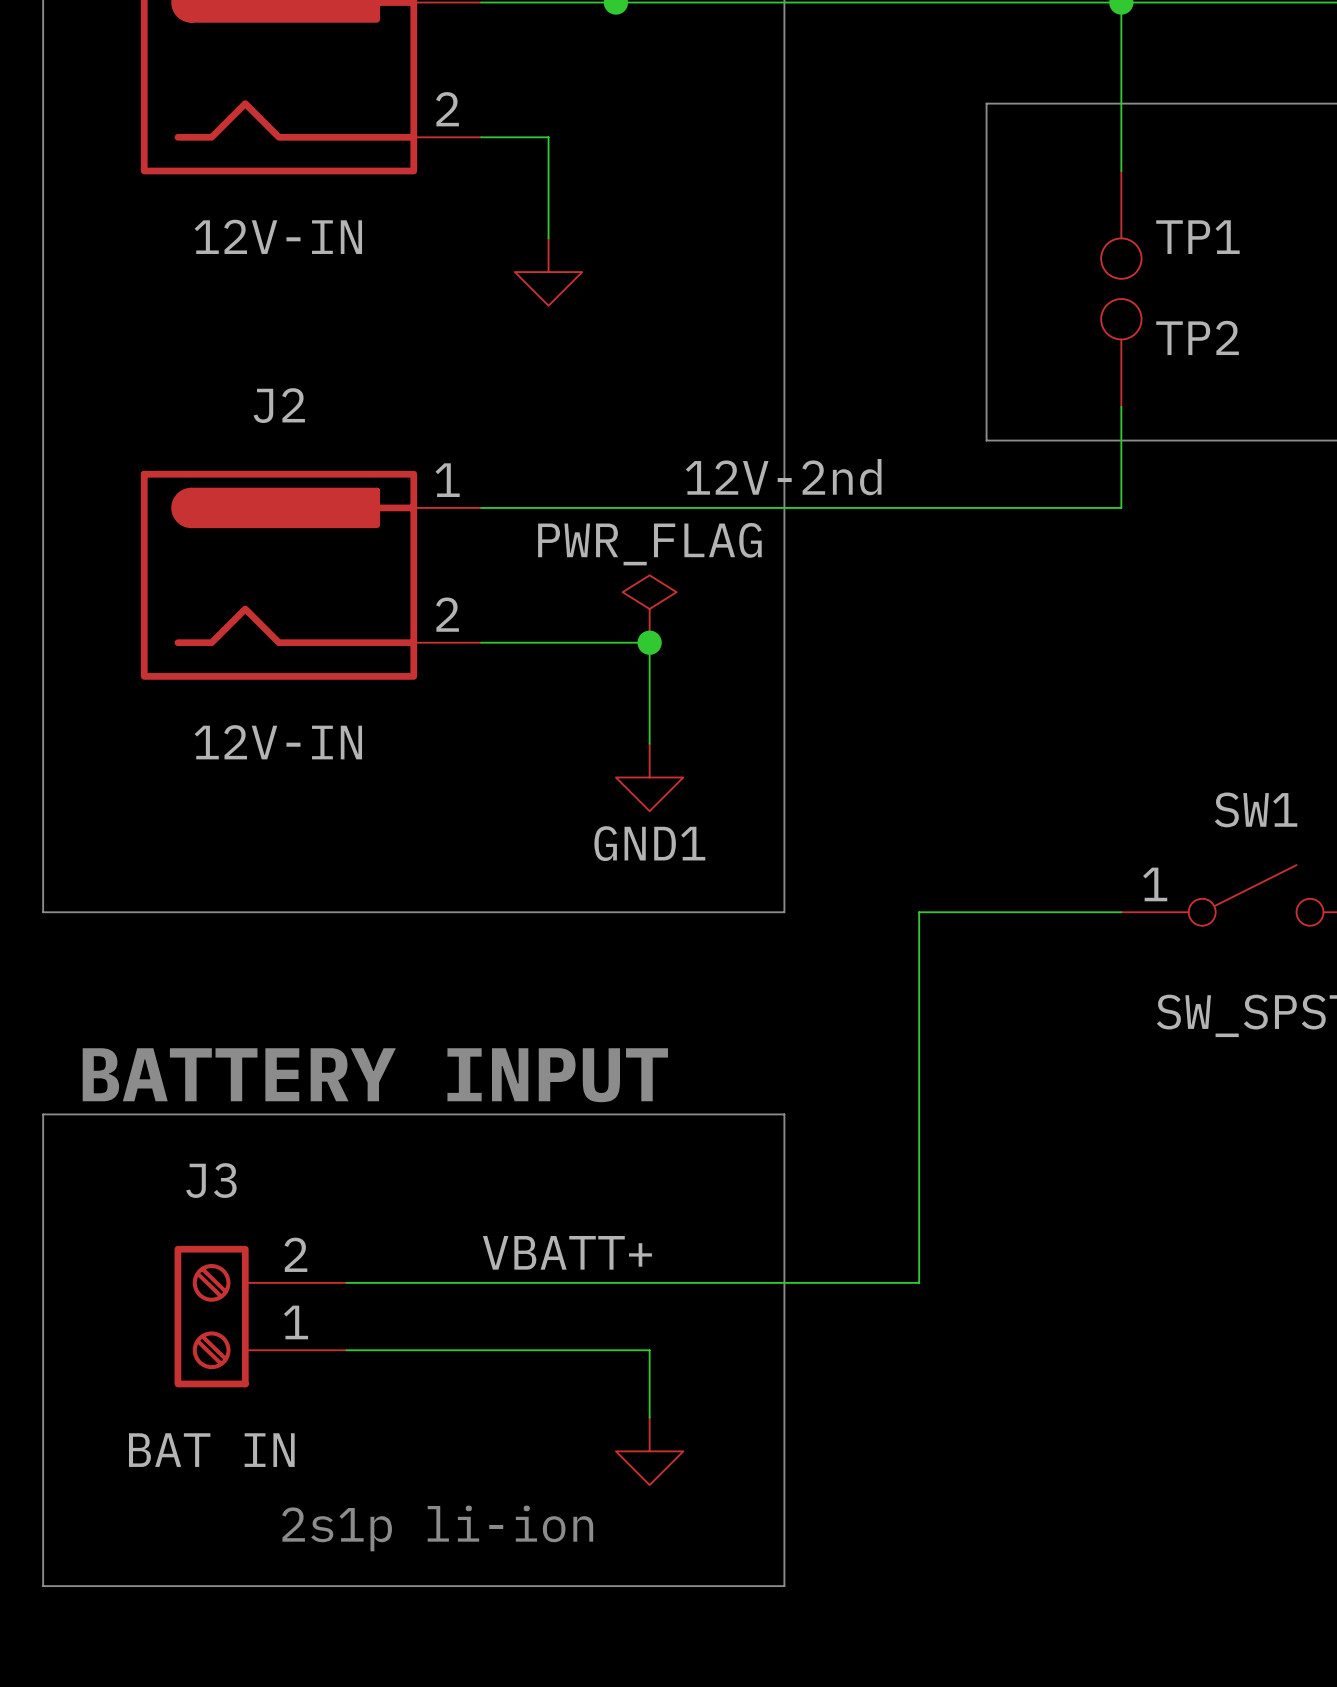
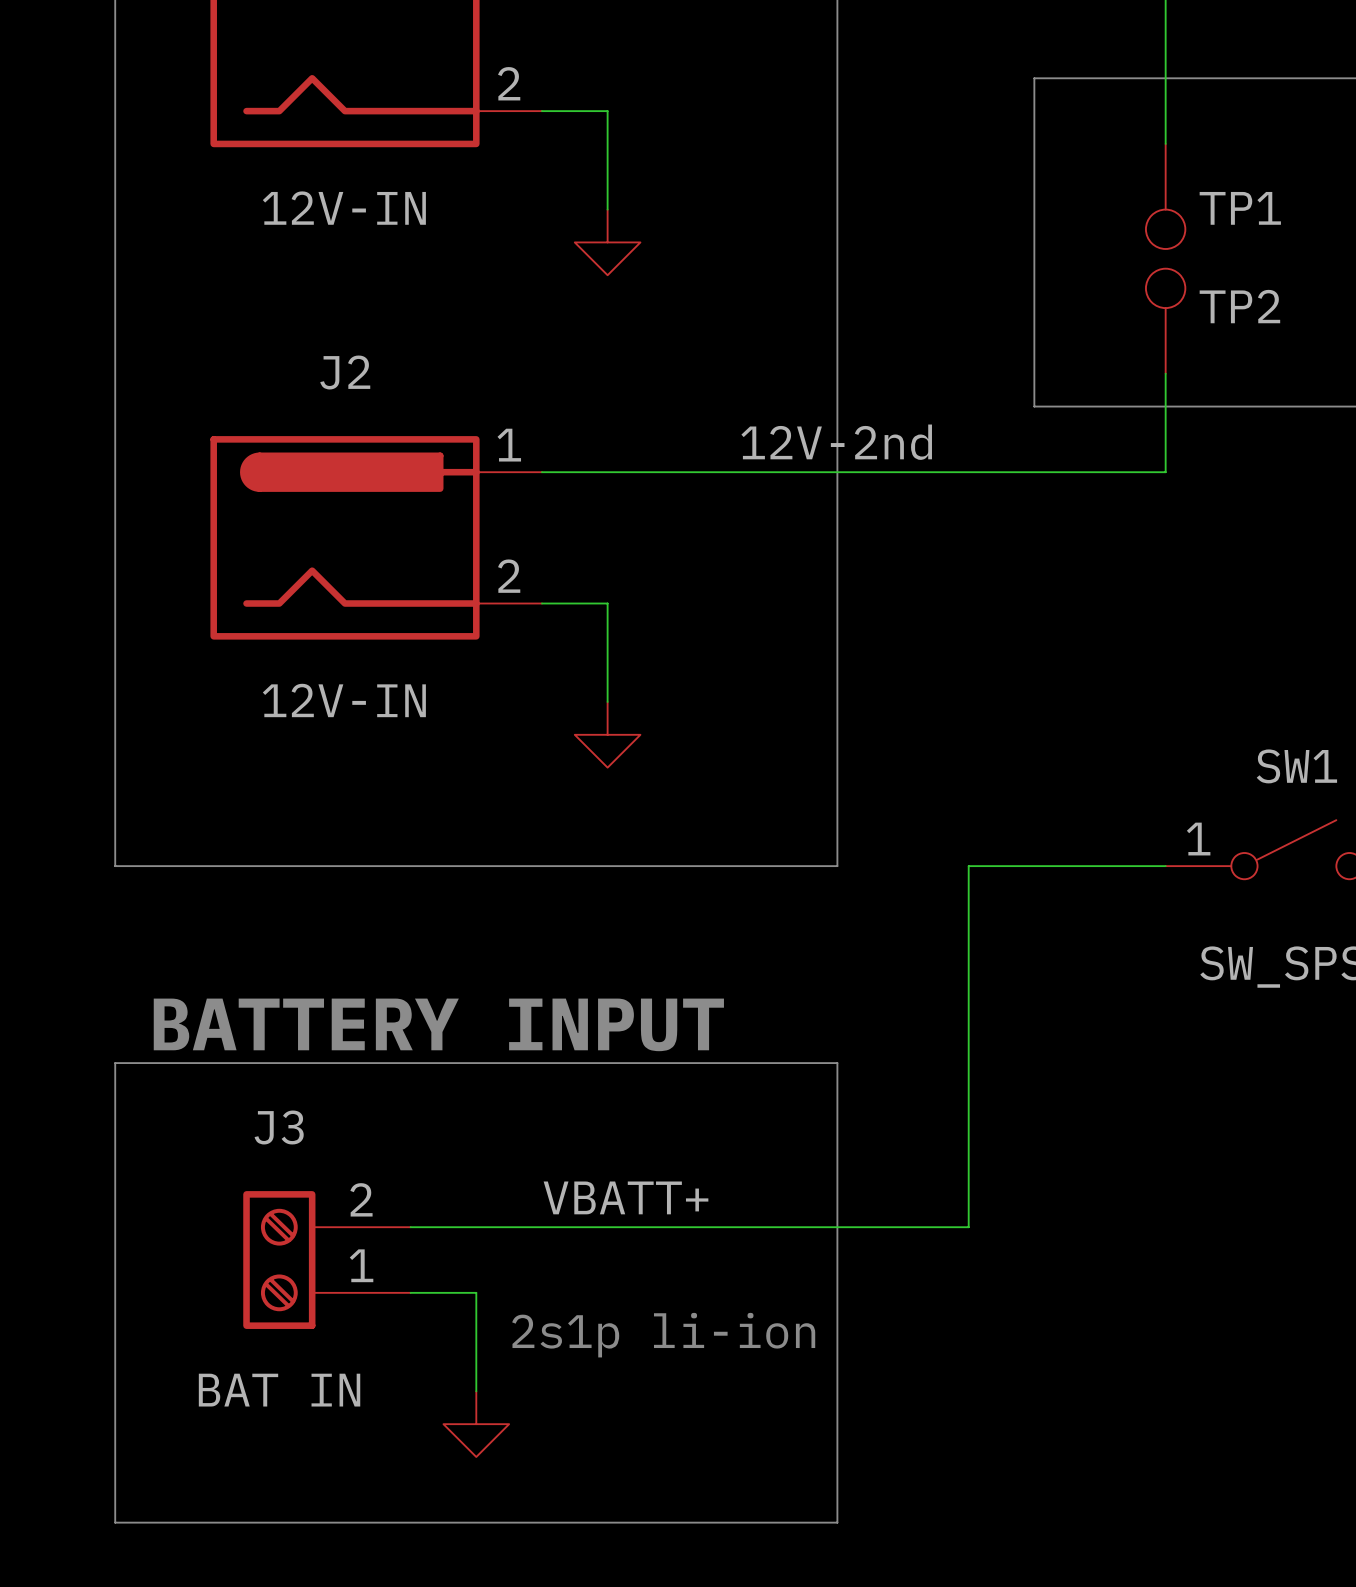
power symbol: PWR_FLAG (649, 609) -> none
wire: (548, 642) (649, 642) (649, 743) -> (607, 603) (607, 701)
junction: (649, 642) -> none
power symbol: none -> (607, 734)
power symbol: GND1 (649, 777) -> none
wire: (413, 1350) (649, 1350) (649, 1417) -> (476, 1292) (476, 1391)
power symbol position: (649, 1451) -> (476, 1424)
text position: 2s1p li-ion (437, 1528) -> 2s1p li-ion (663, 1335)

